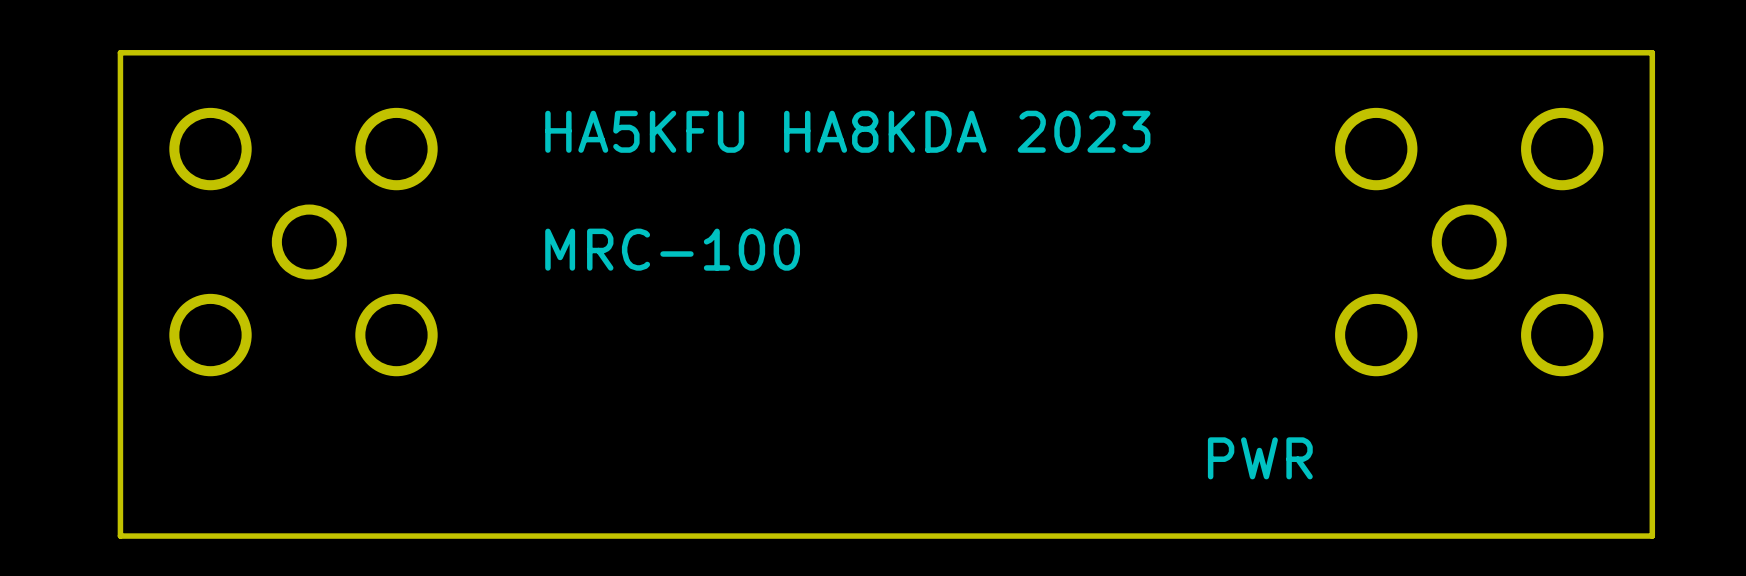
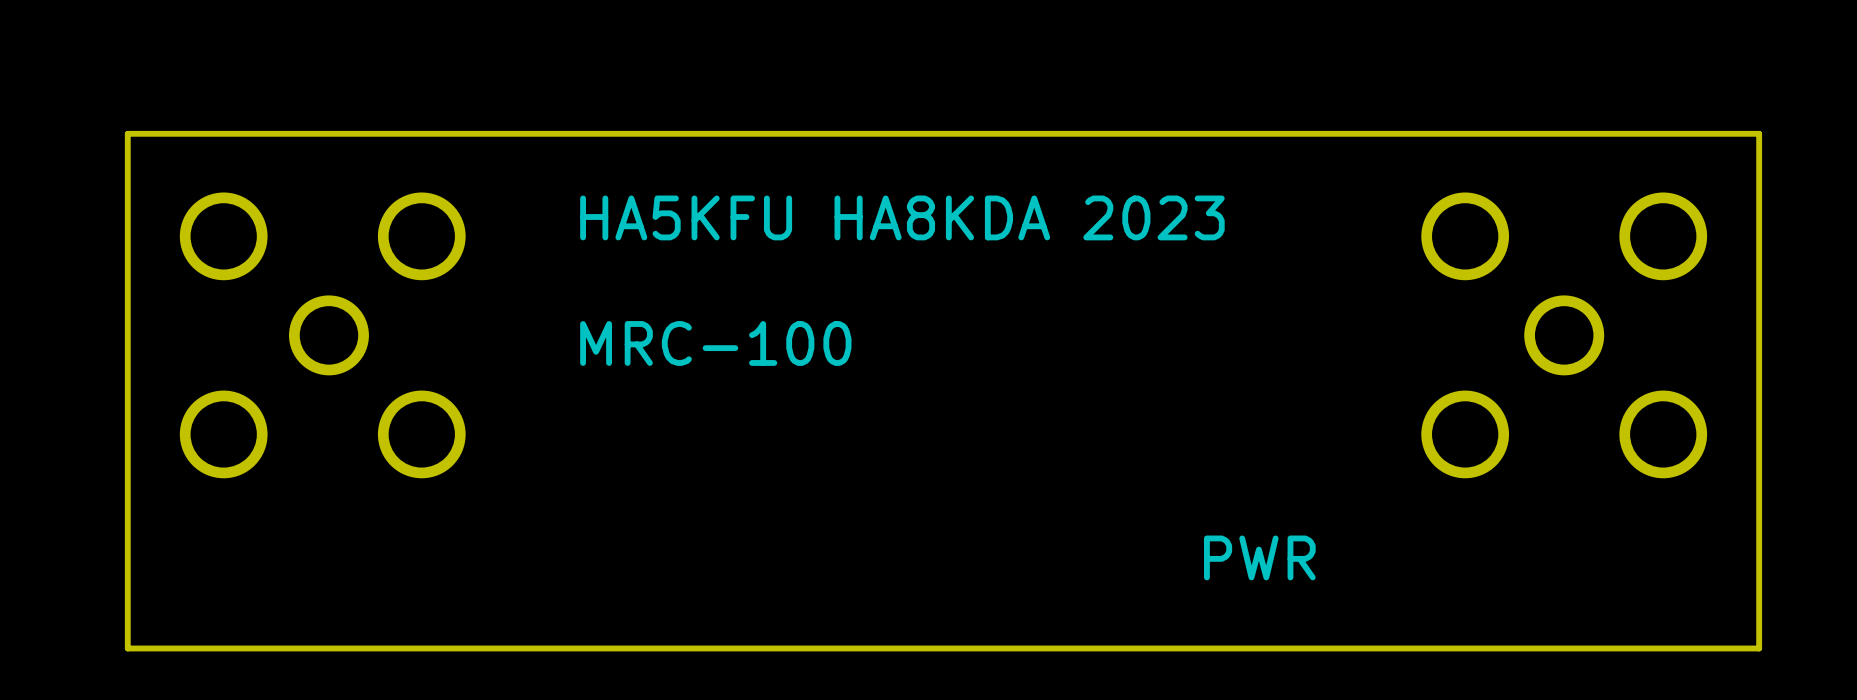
text position: PWR (1260, 458) -> PWR (1259, 557)

